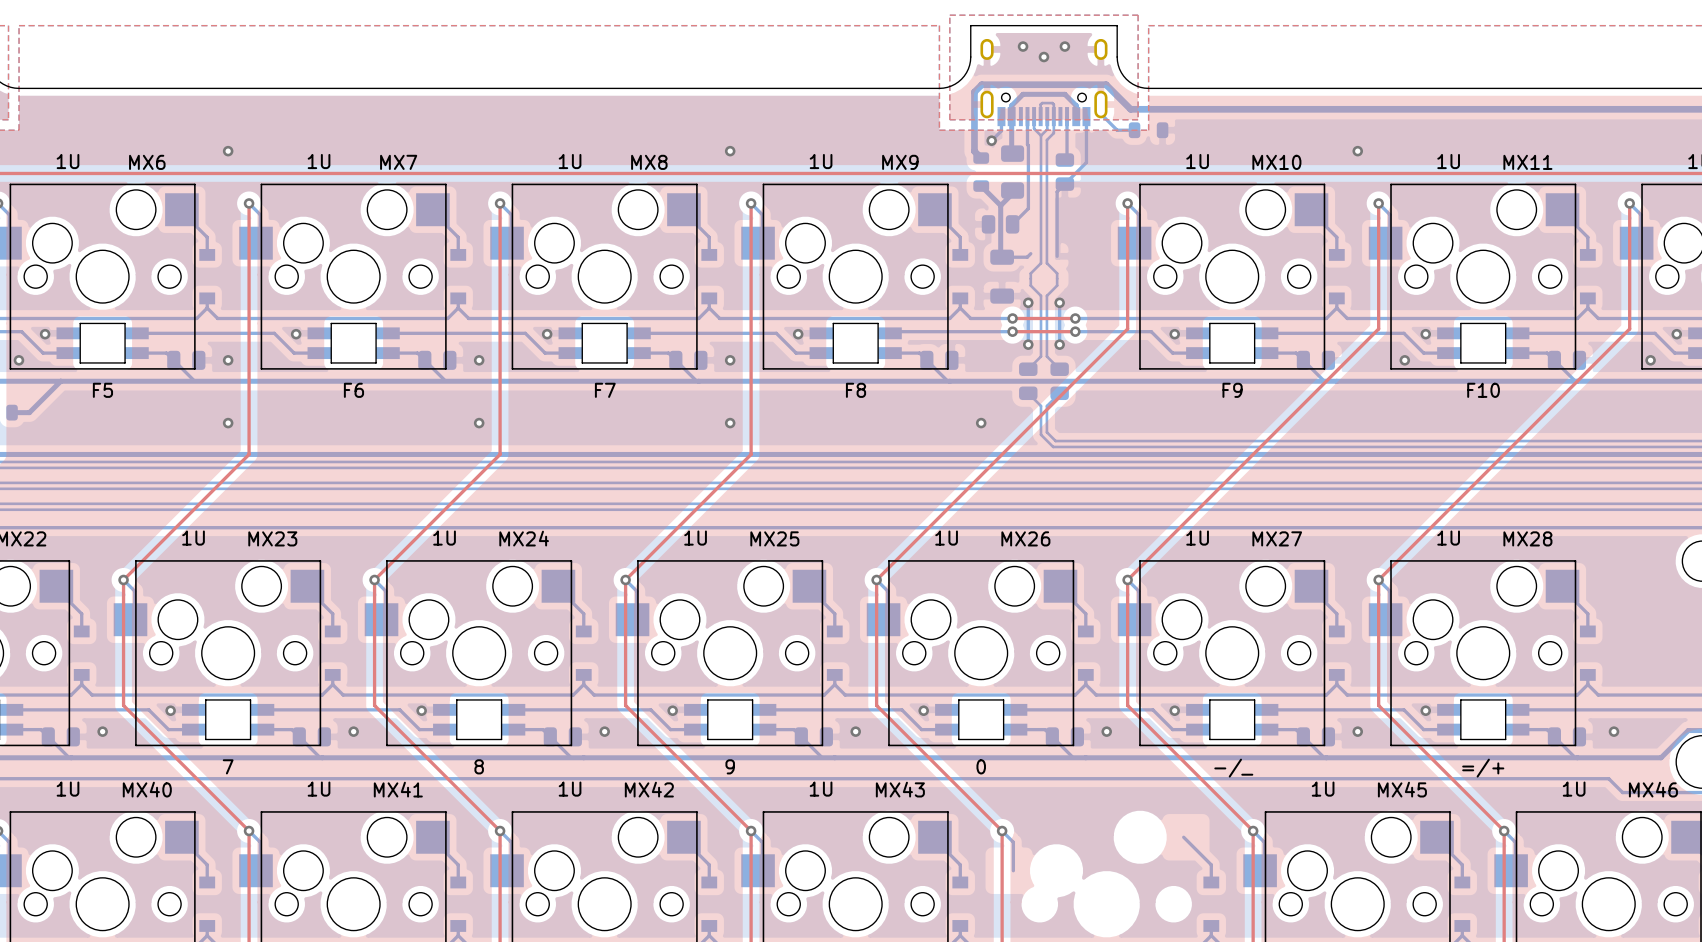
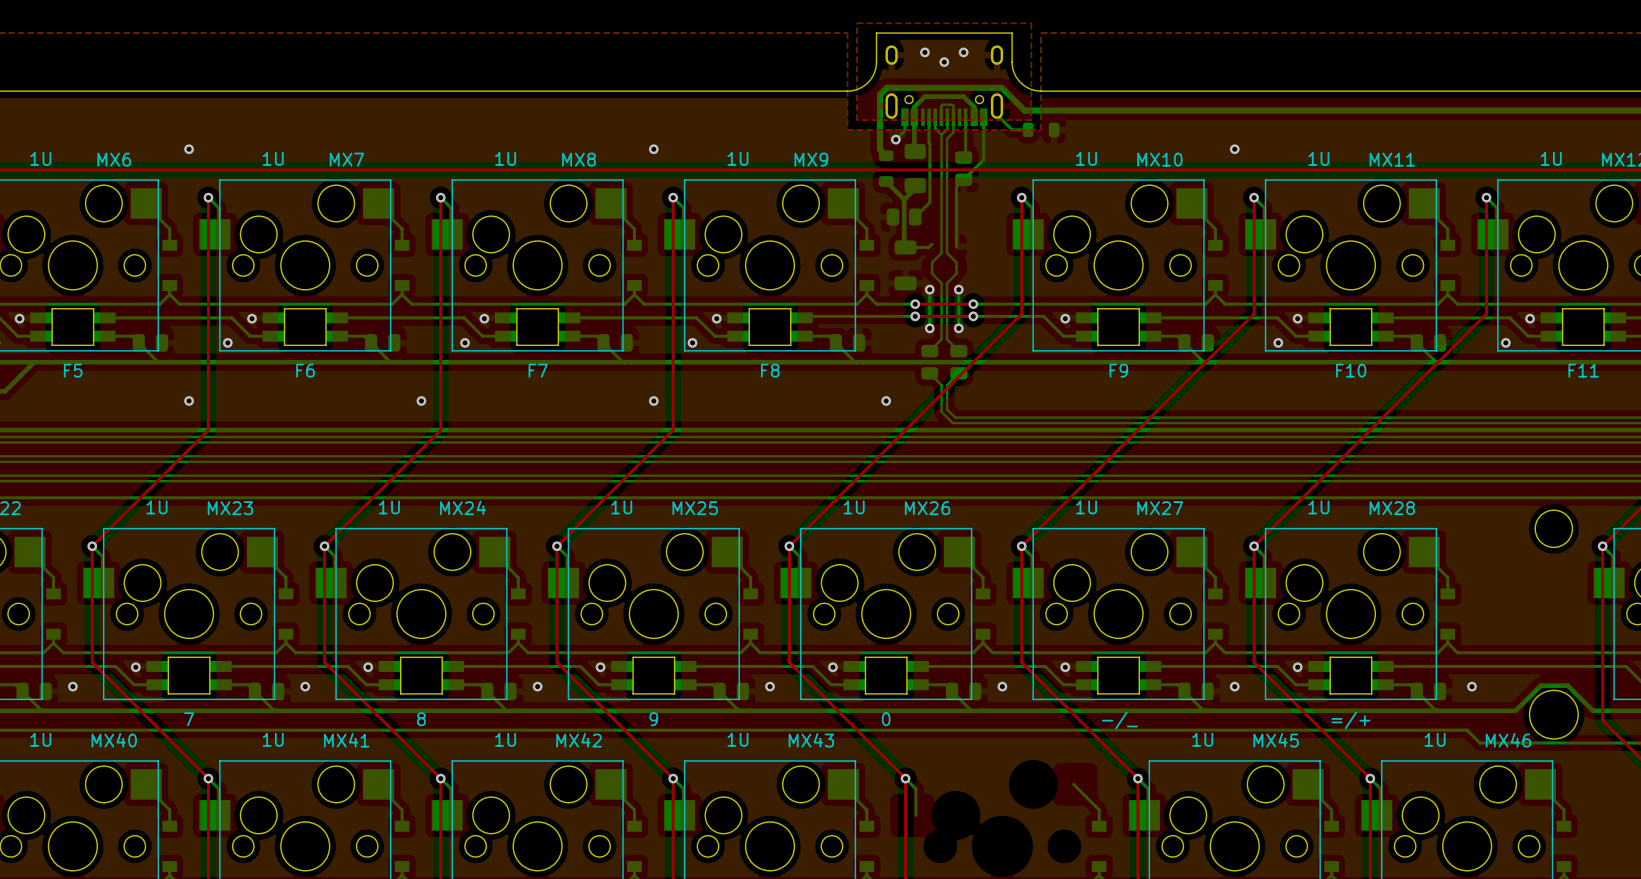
via position: (228, 360) -> (227, 342)
via position: (479, 360) -> (465, 342)
via position: (730, 360) -> (692, 342)

